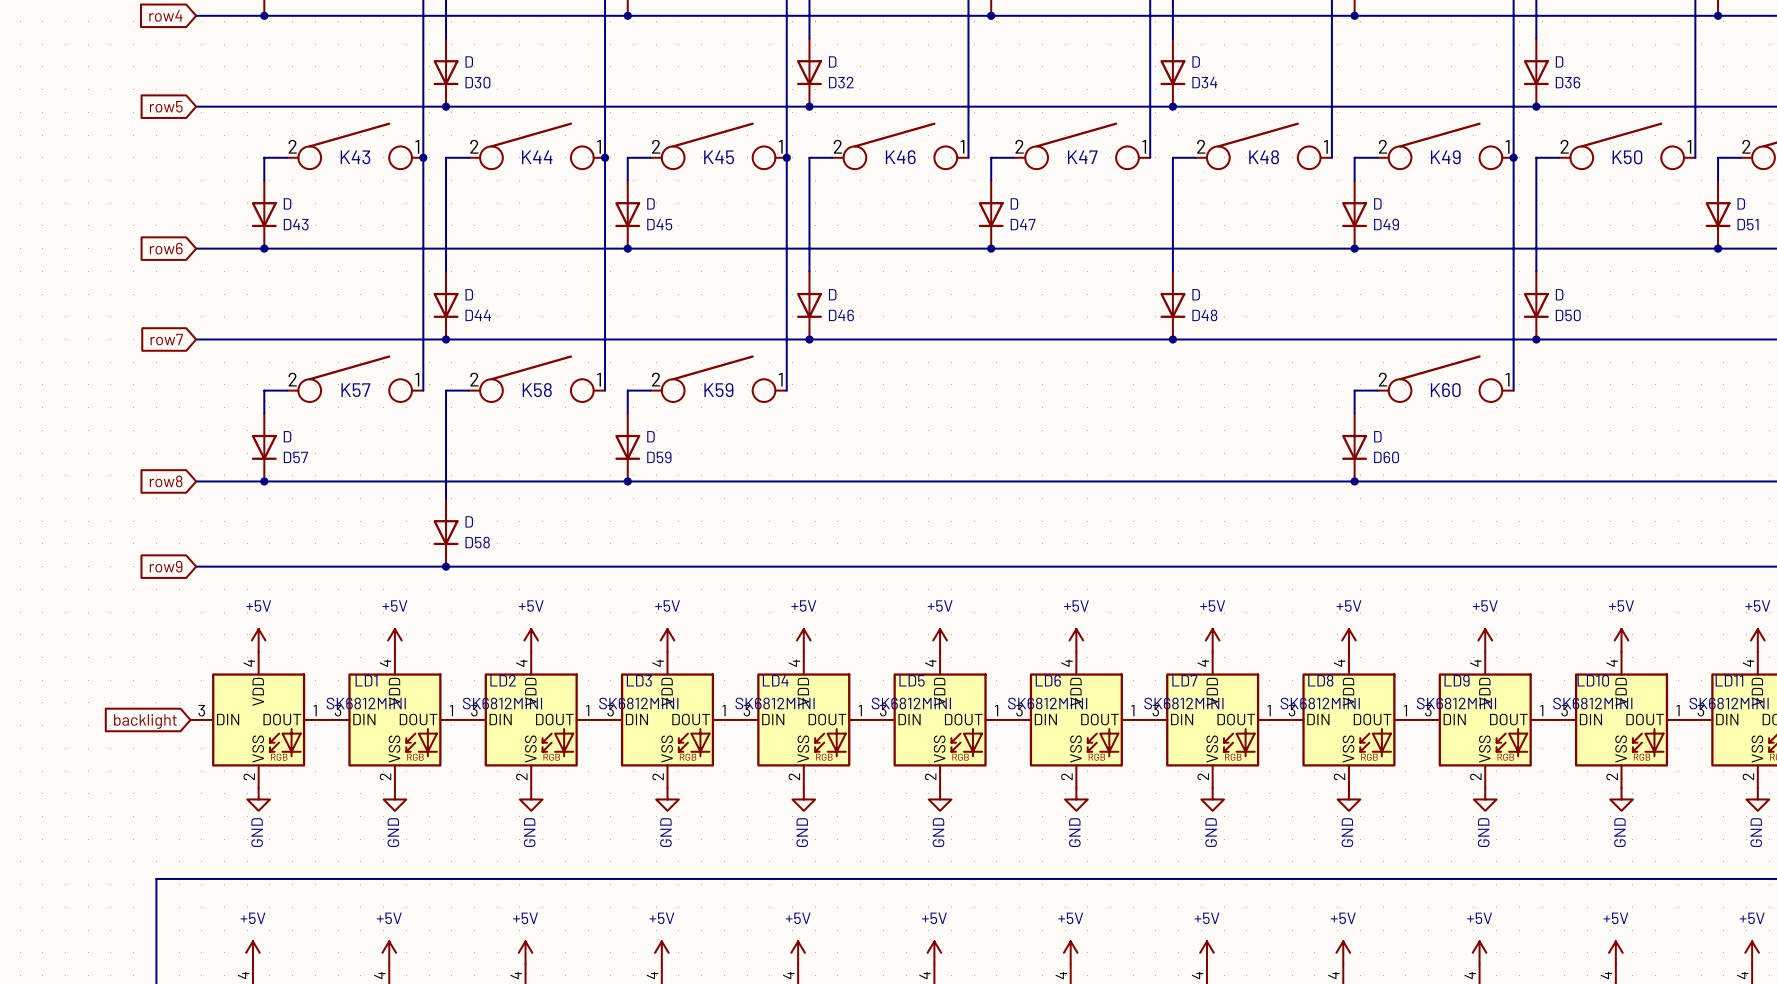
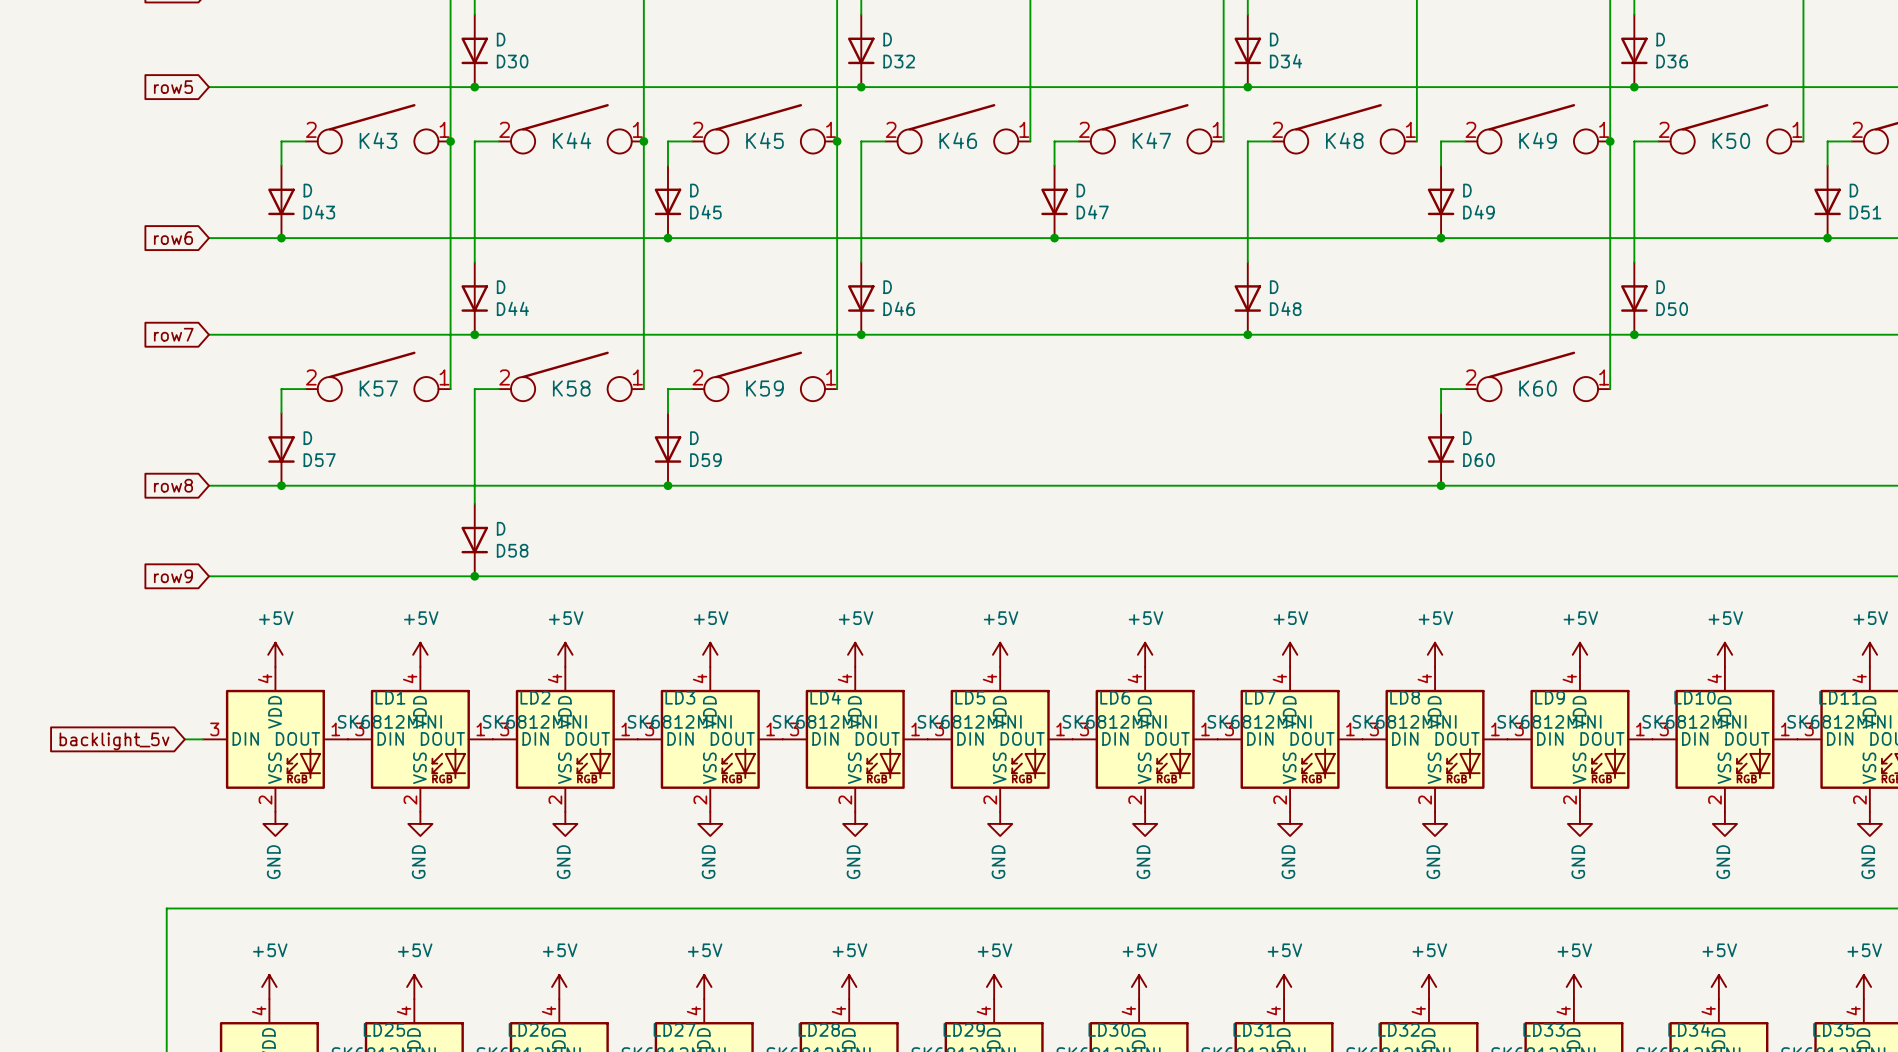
wire: none -> (184, 739) (202, 739)
global label: backlight (145, 721) -> backlight_5v (114, 741)

